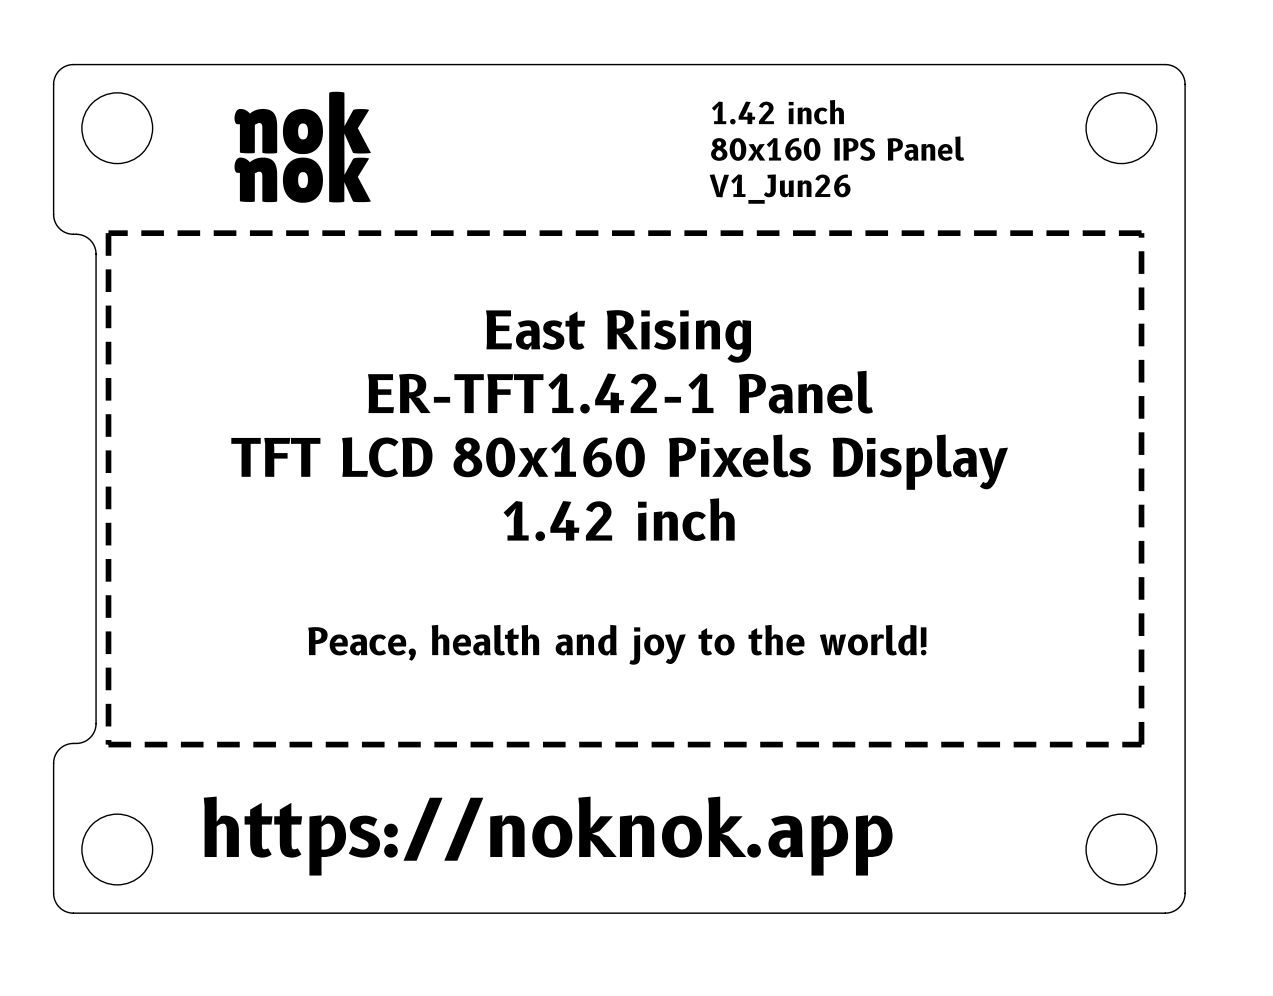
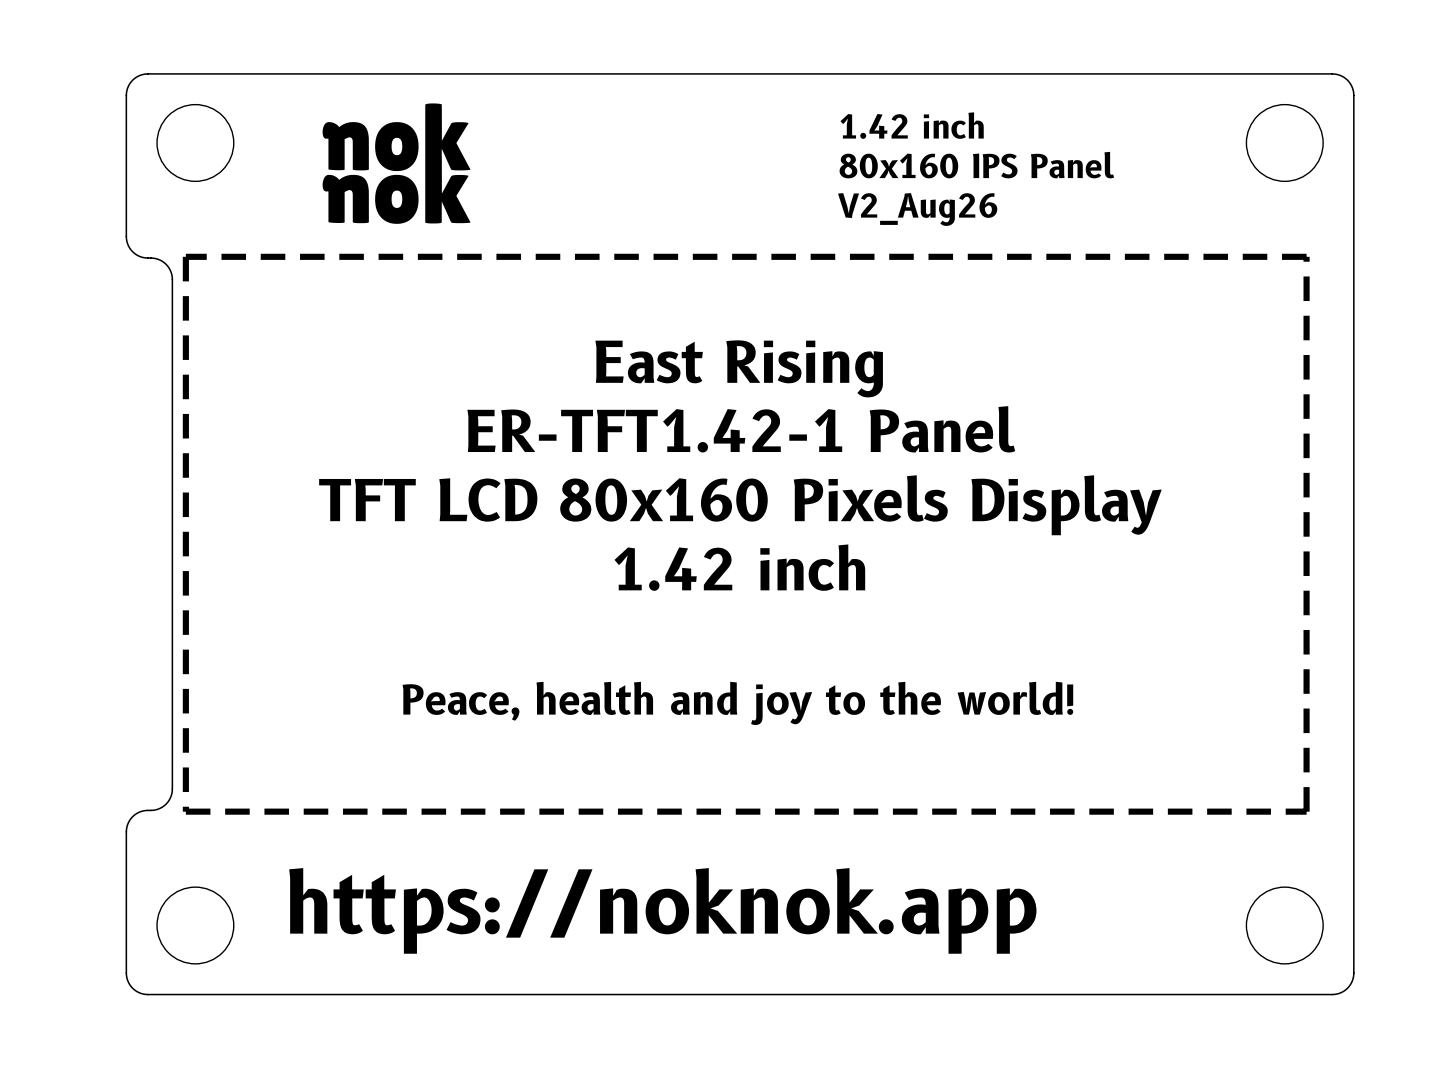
text: V1_Jun26 (780, 189) -> V2_Aug26 (917, 209)

